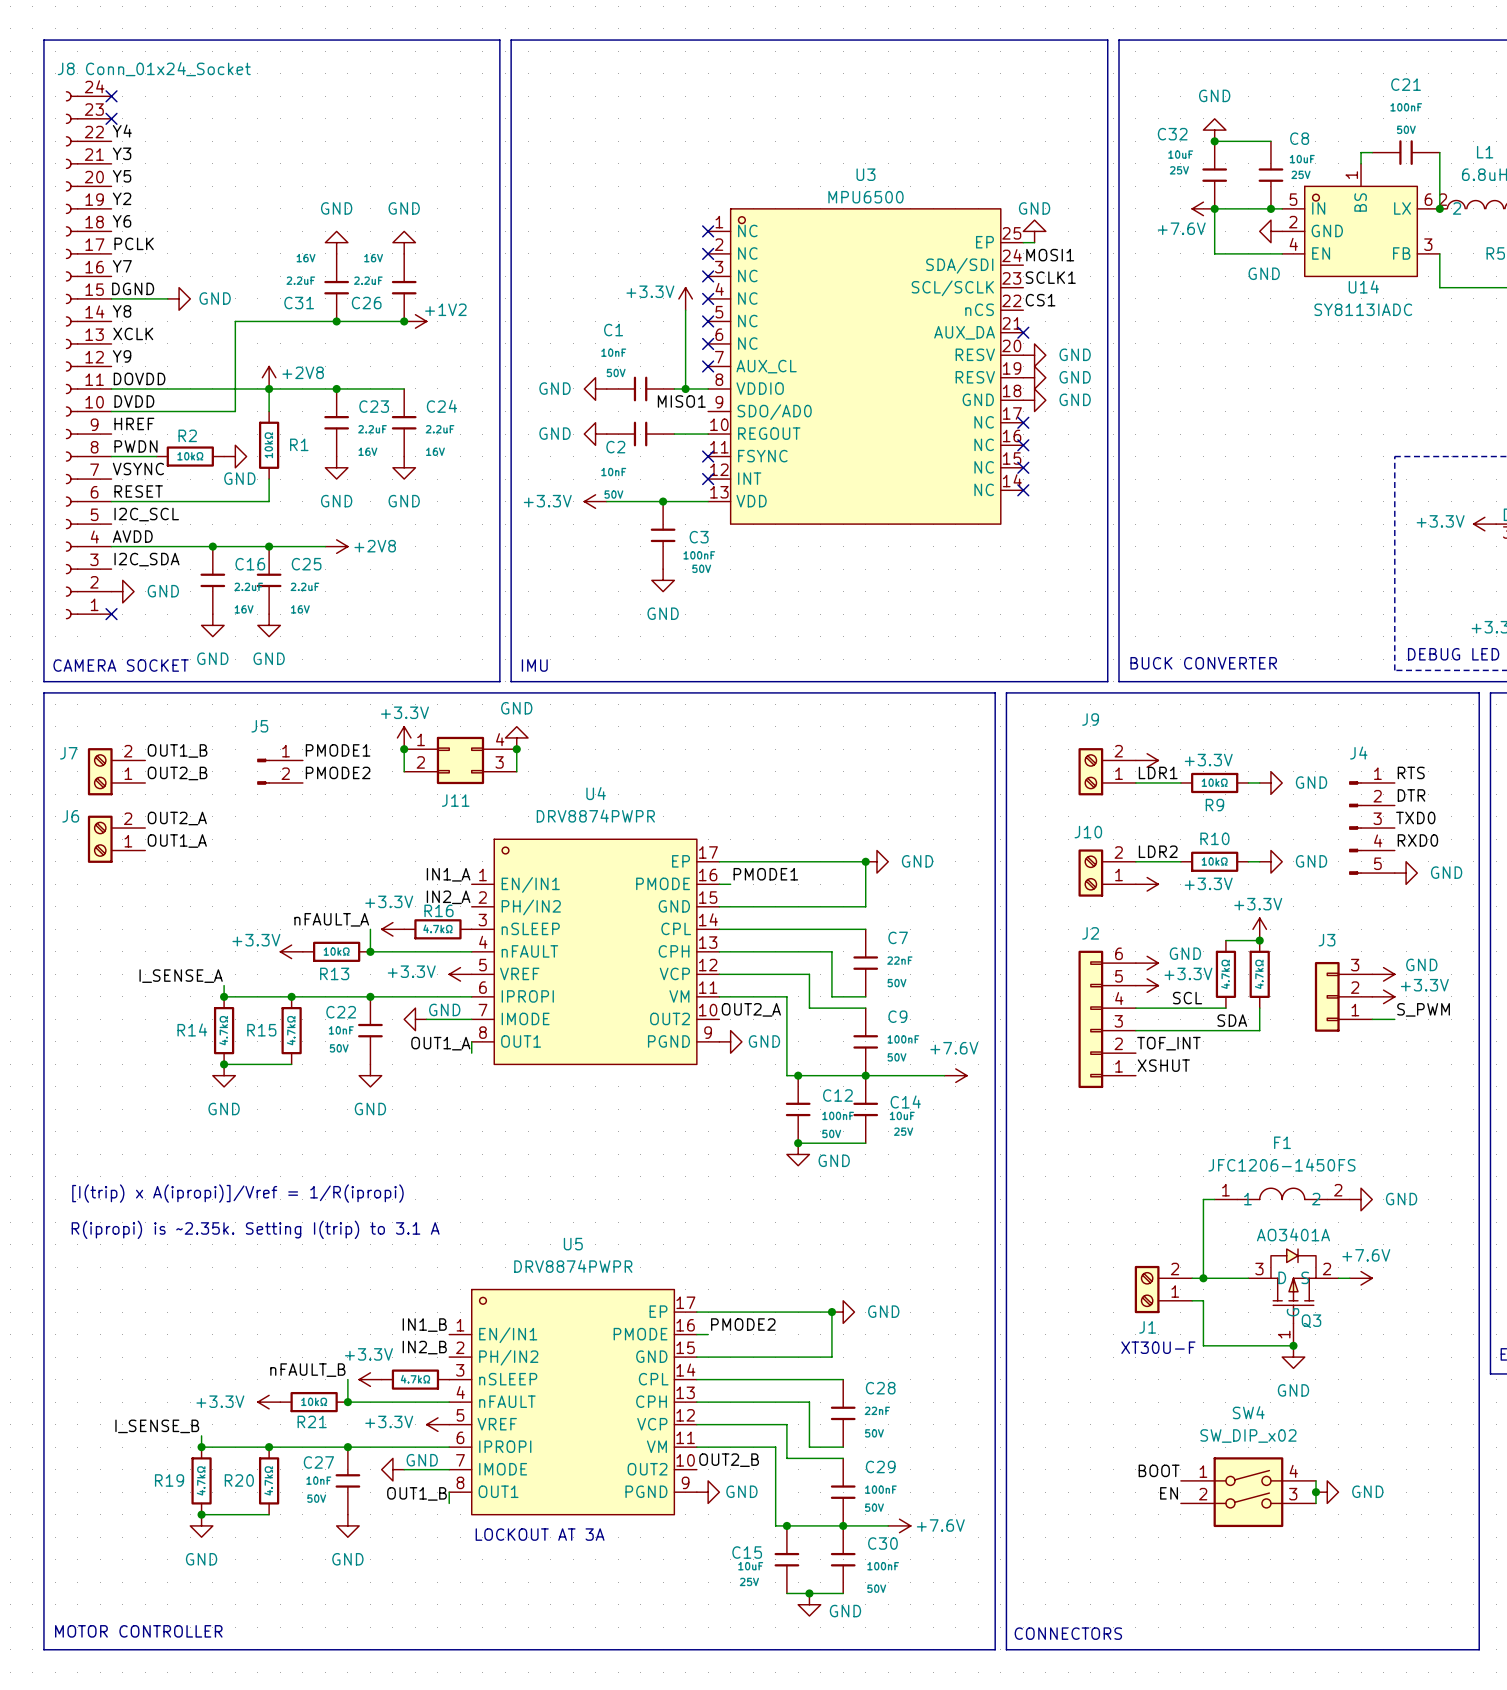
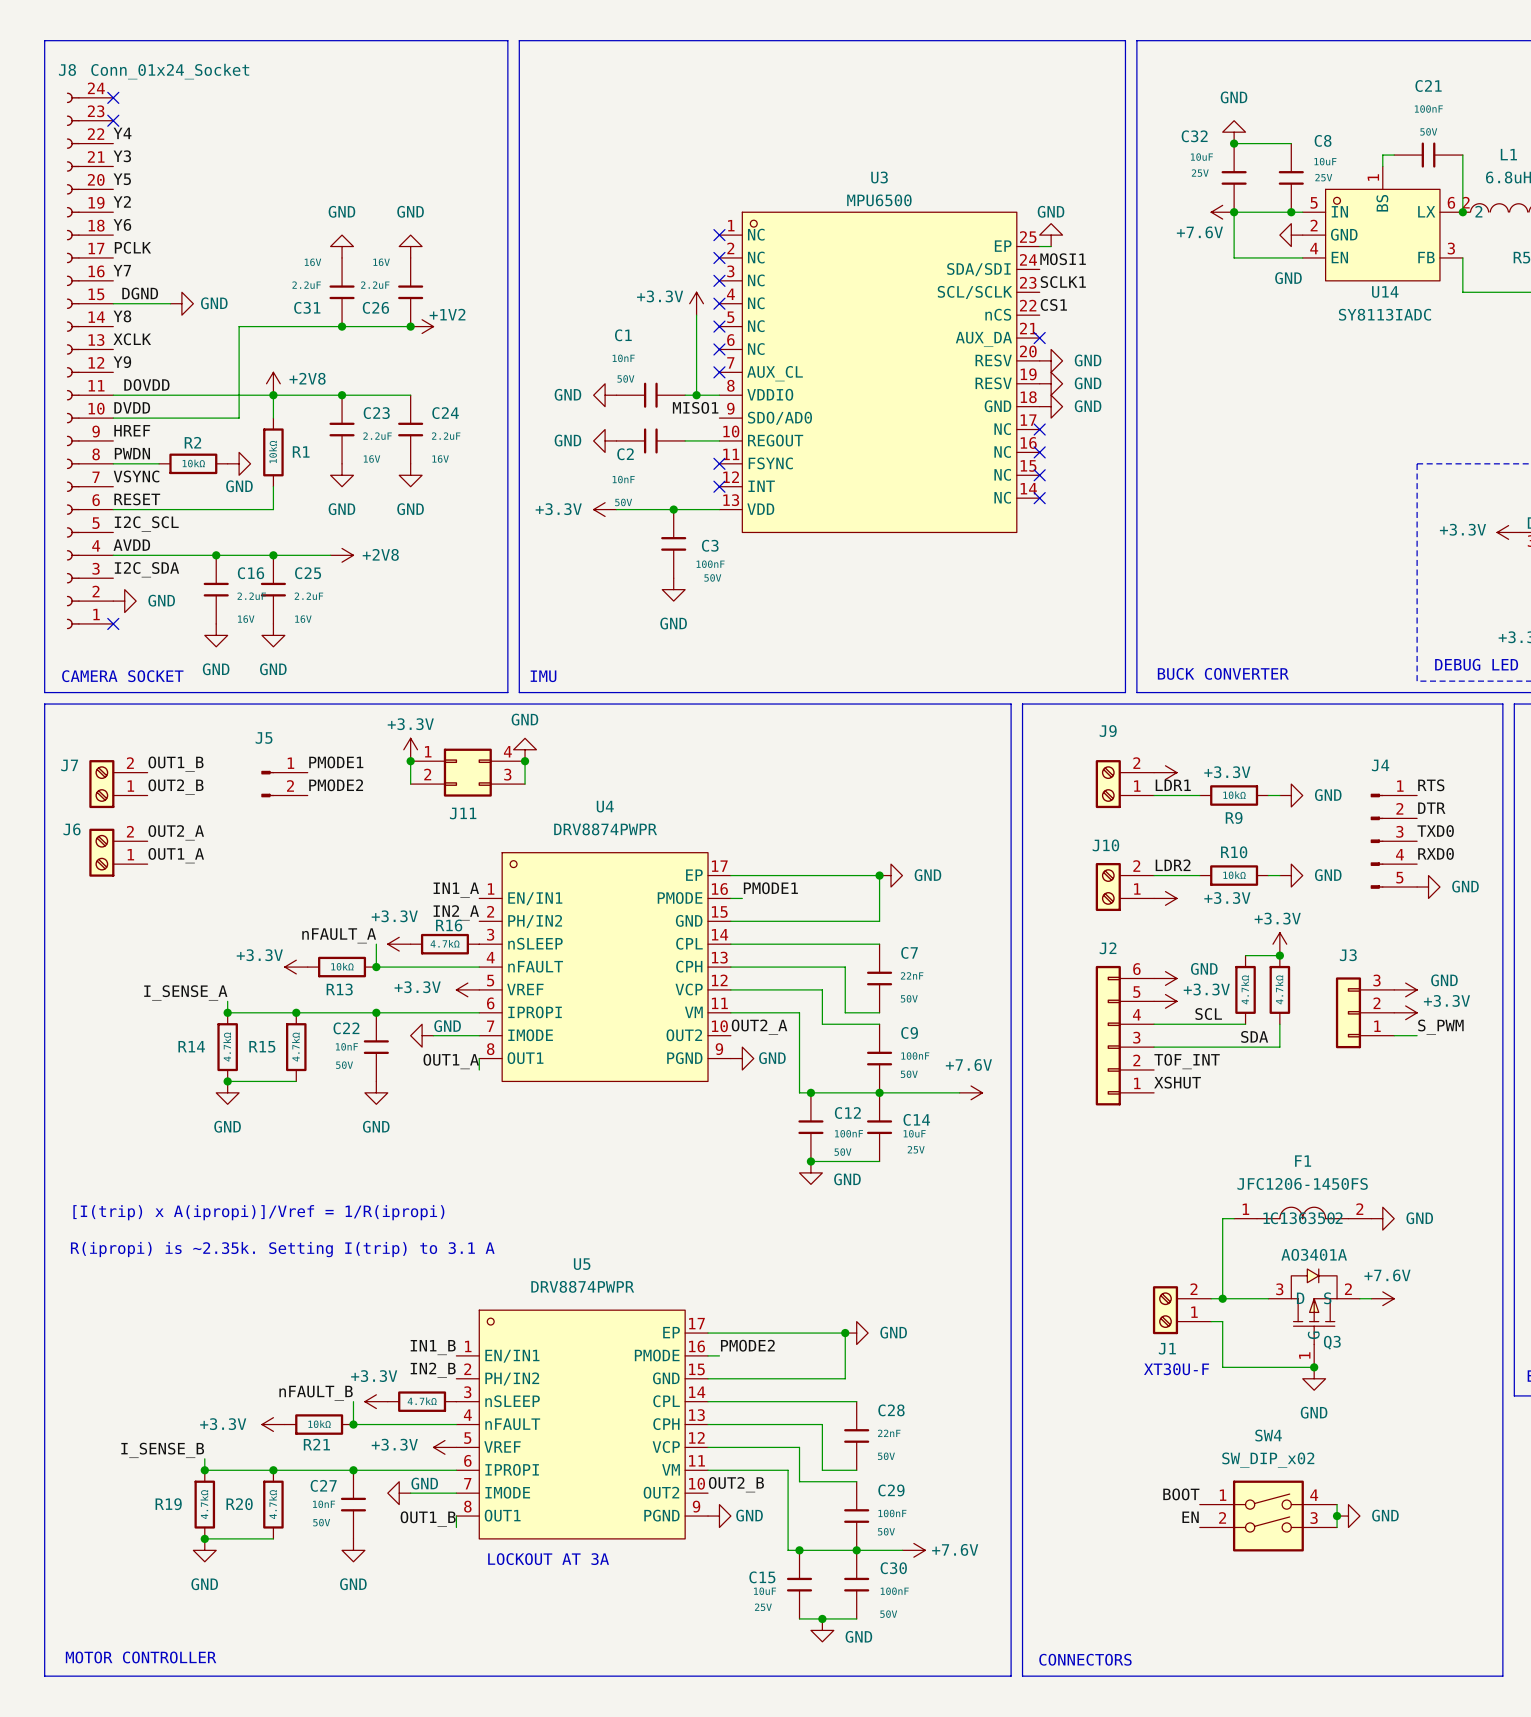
F1 text: none -> C136350 (1302, 1218)

